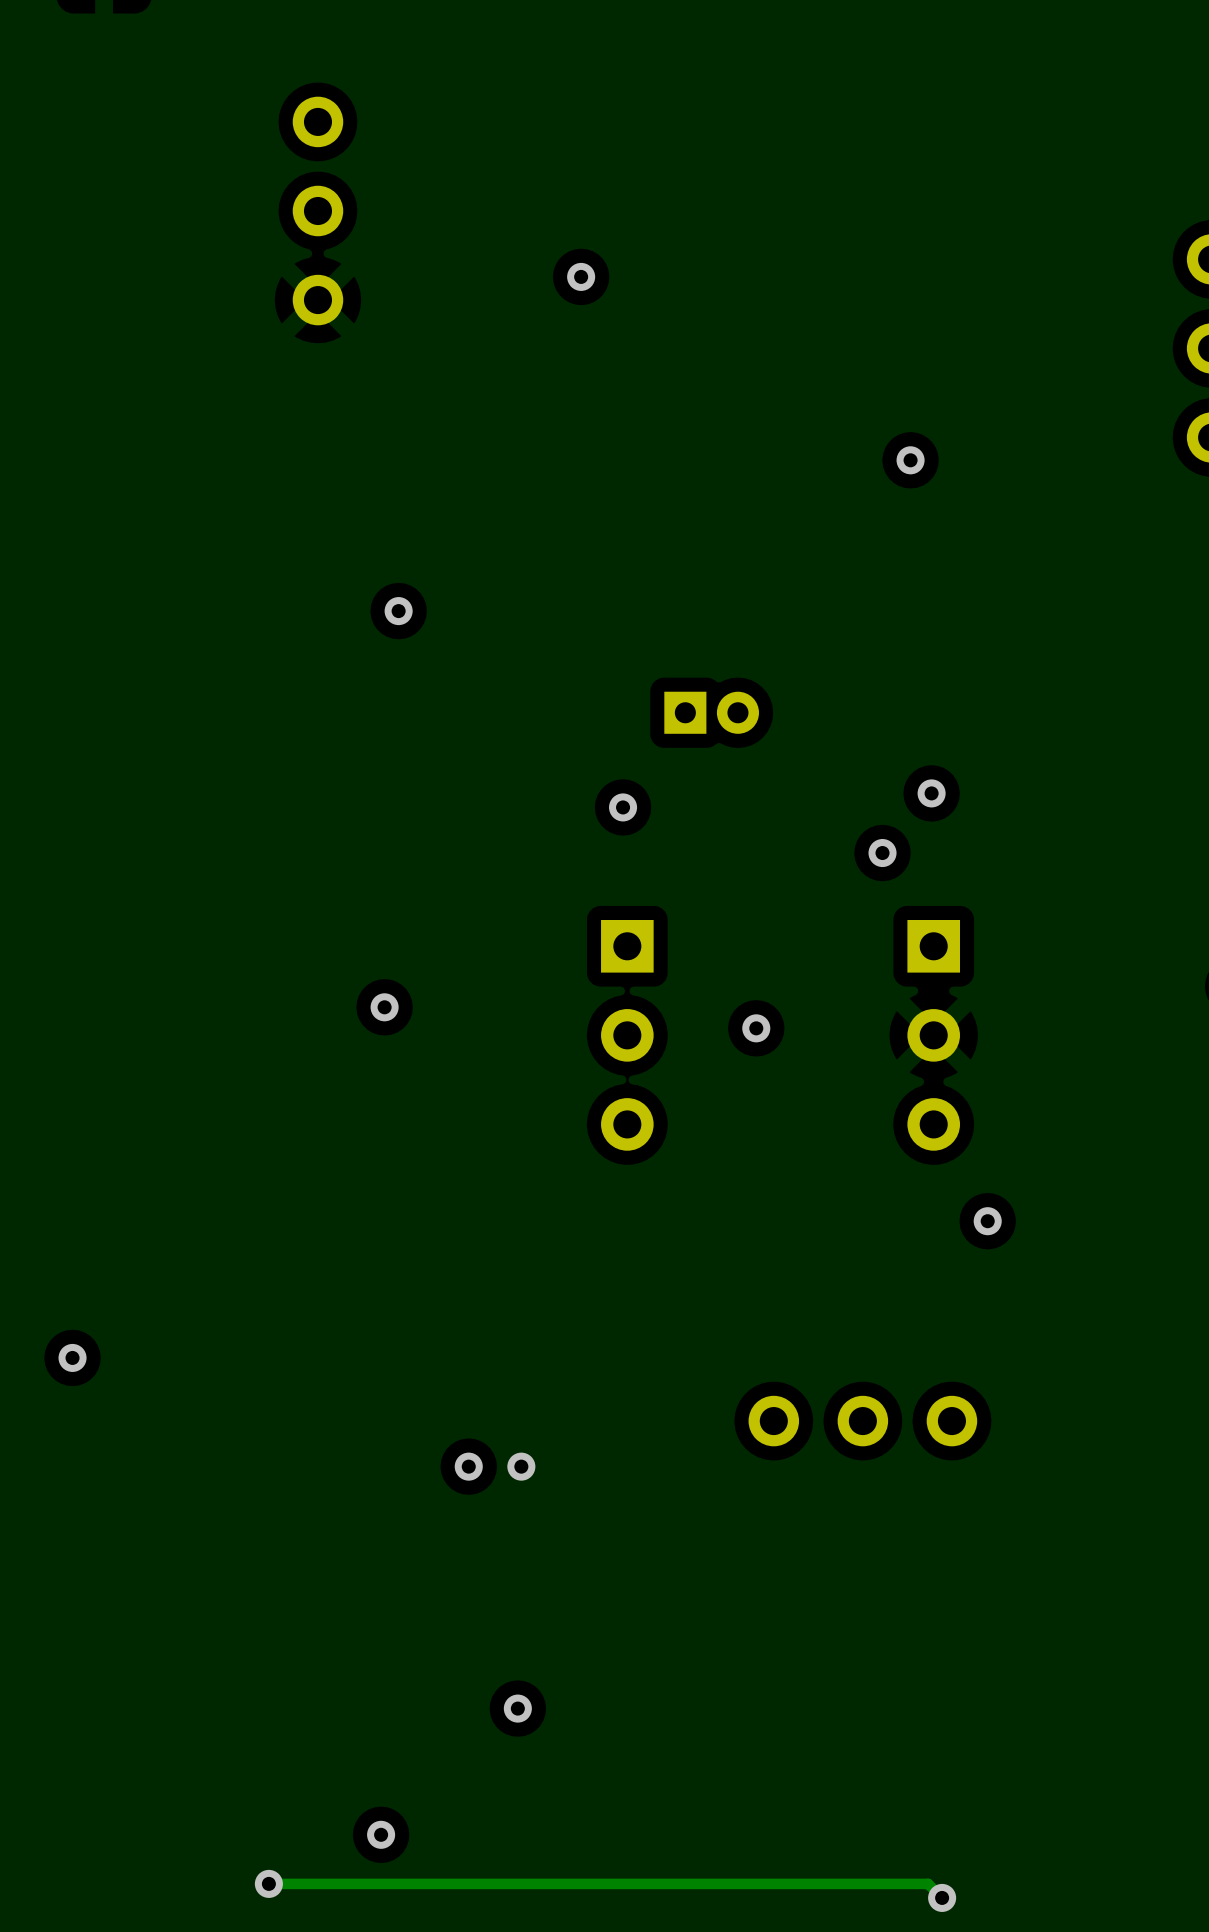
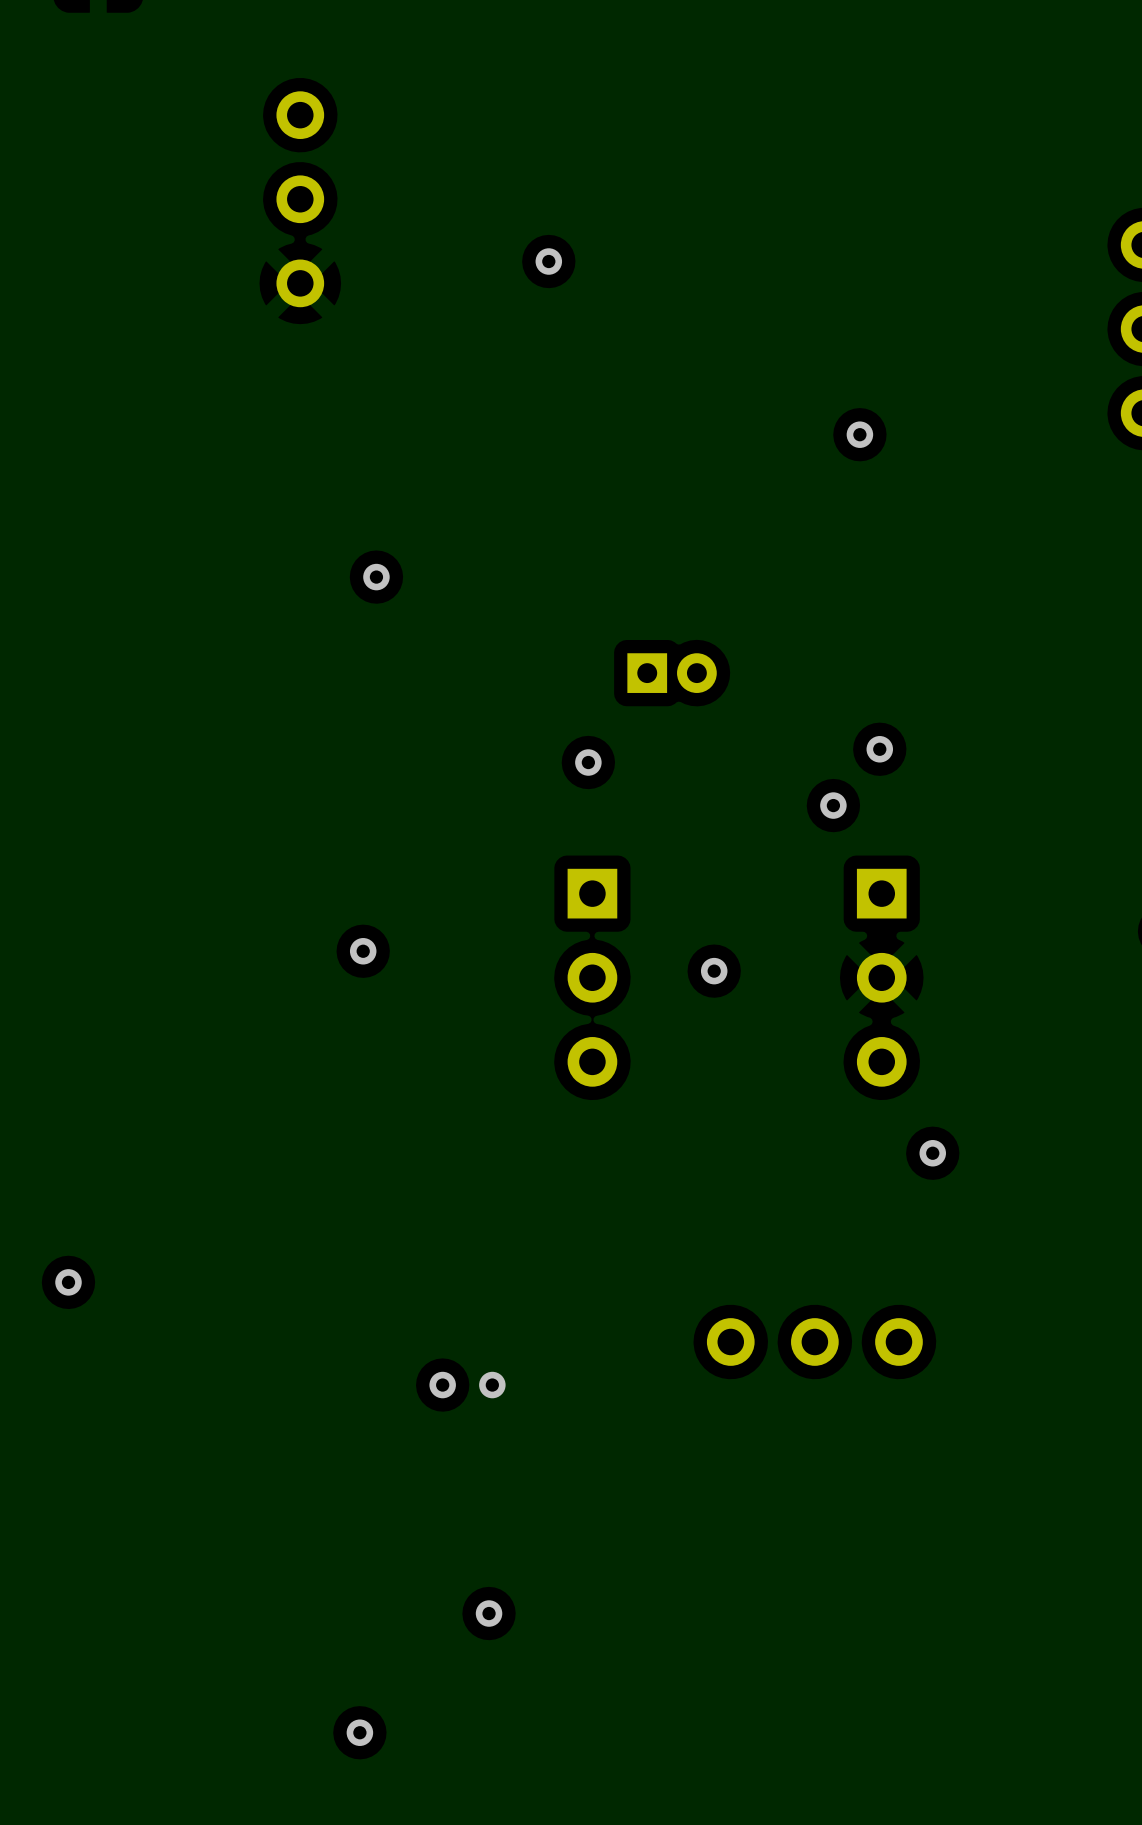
track: (268, 1883) (928, 1883) (942, 1897) -> none
via: (268, 1883) -> none
via: (942, 1897) -> none

